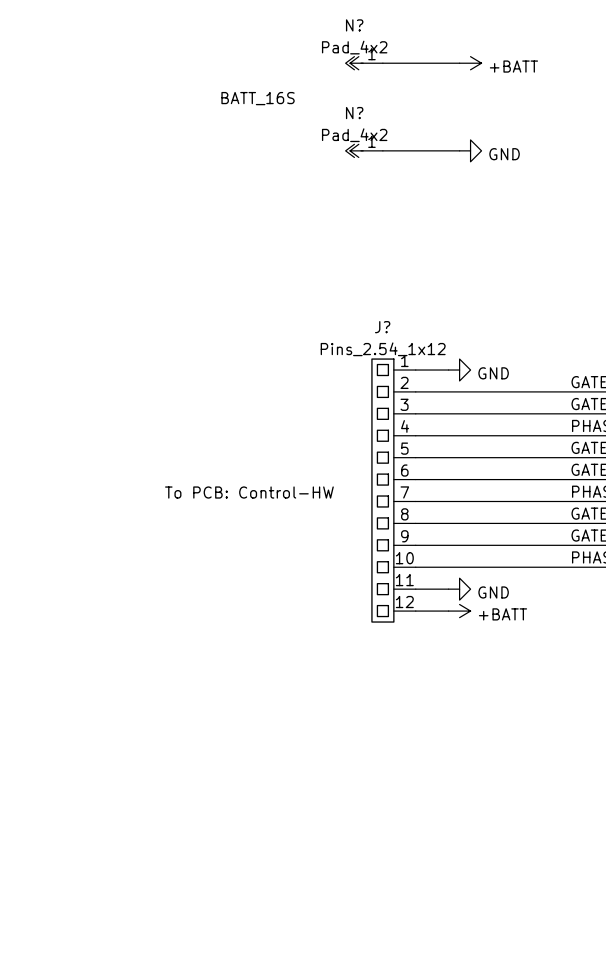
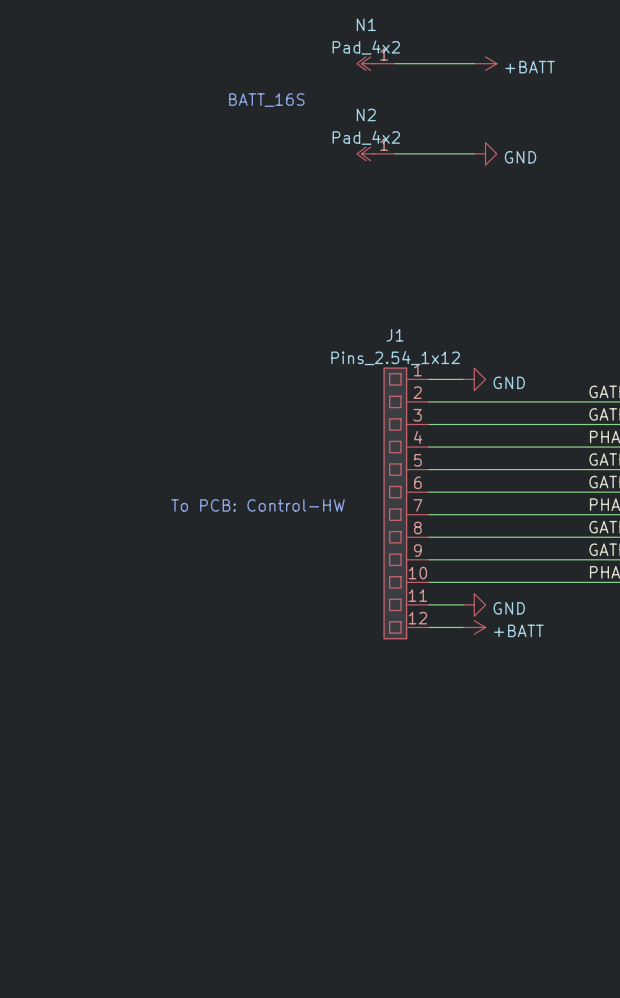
N? name: N? (354, 25) -> N1 (366, 24)
N? name: N? (354, 113) -> N2 (366, 114)
J? name: J? (382, 327) -> J1 (395, 335)

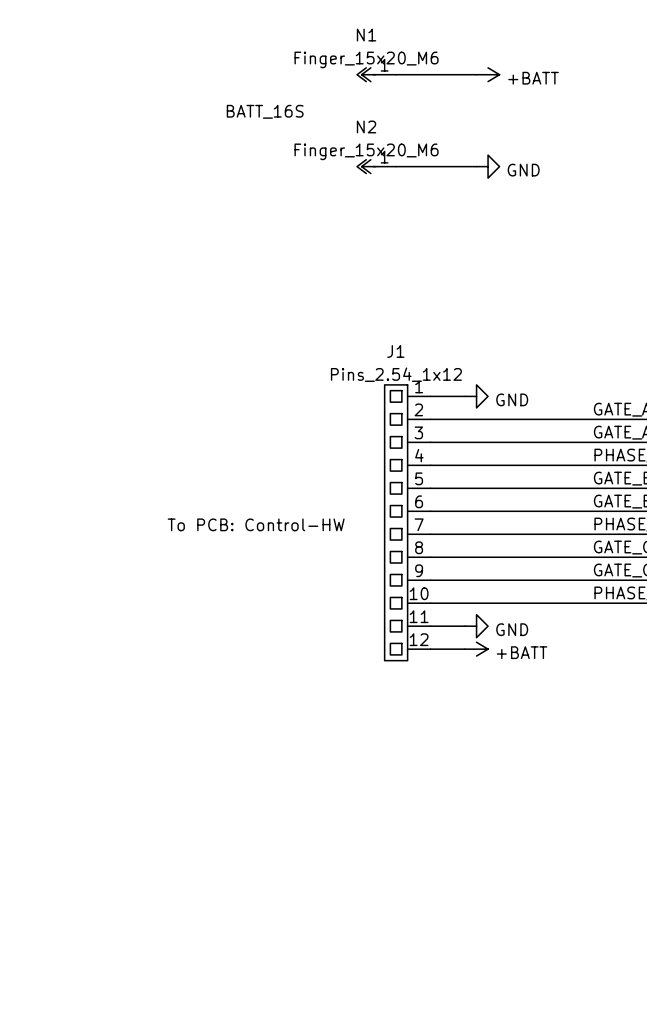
N1 value: Pad_4x2 (366, 47) -> Finger_15x20_M6 (366, 59)
N2 value: Pad_4x2 (366, 137) -> Finger_15x20_M6 (366, 151)

